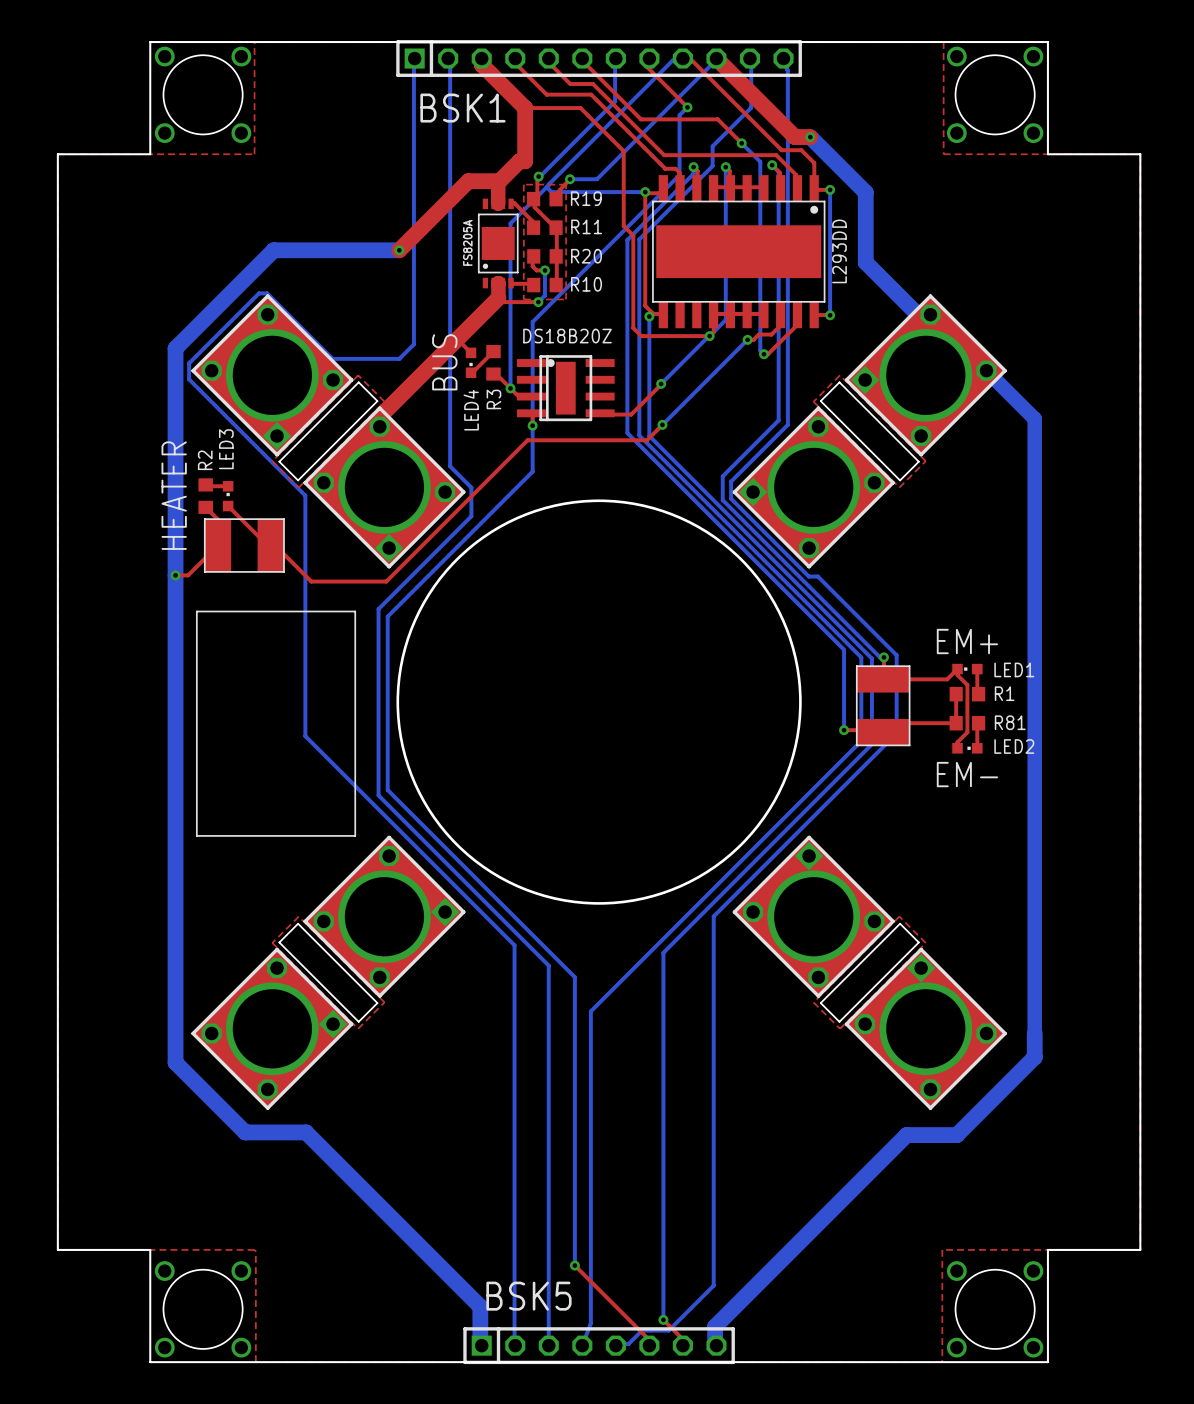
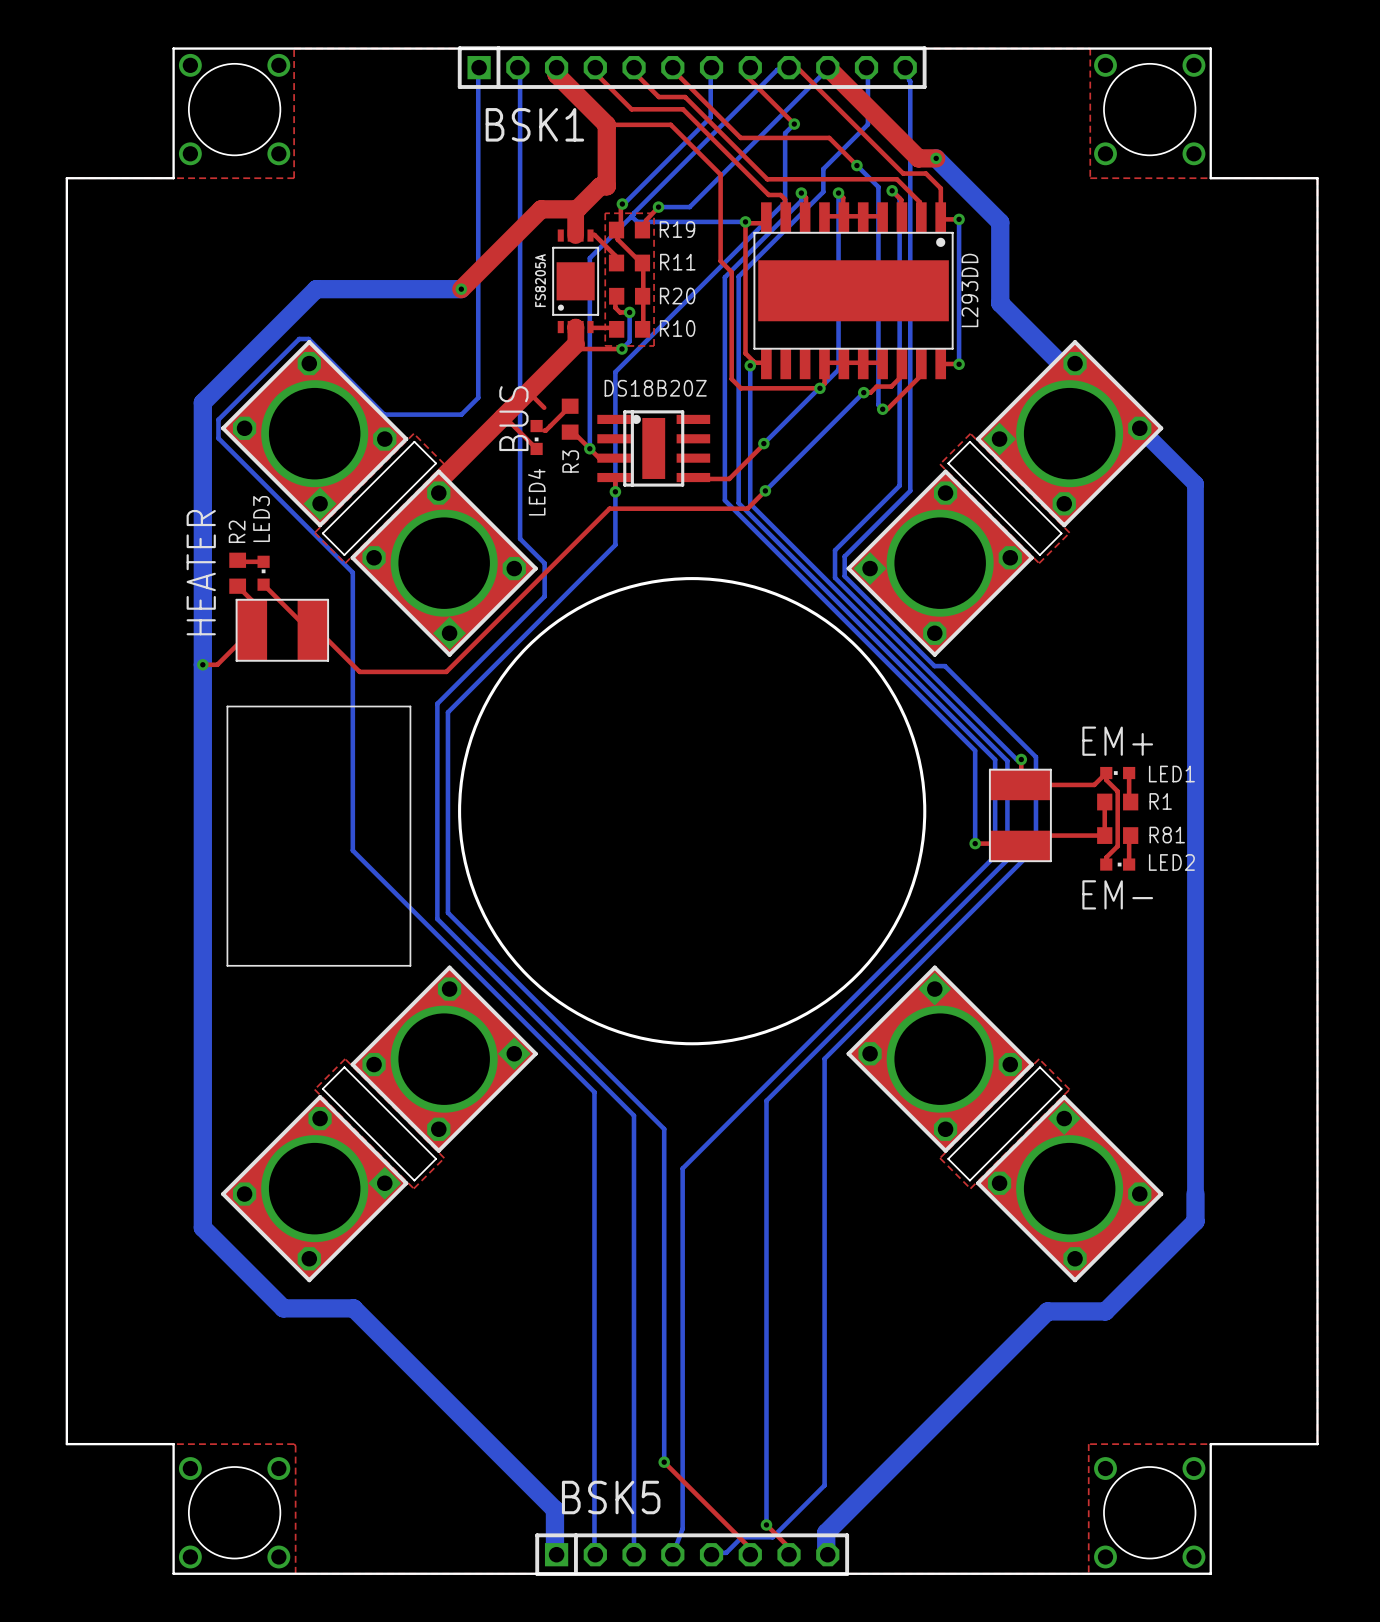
top track: none -> (502, 417) (505, 417) (536, 448)
LED4 position: (471, 362) -> (536, 437)

